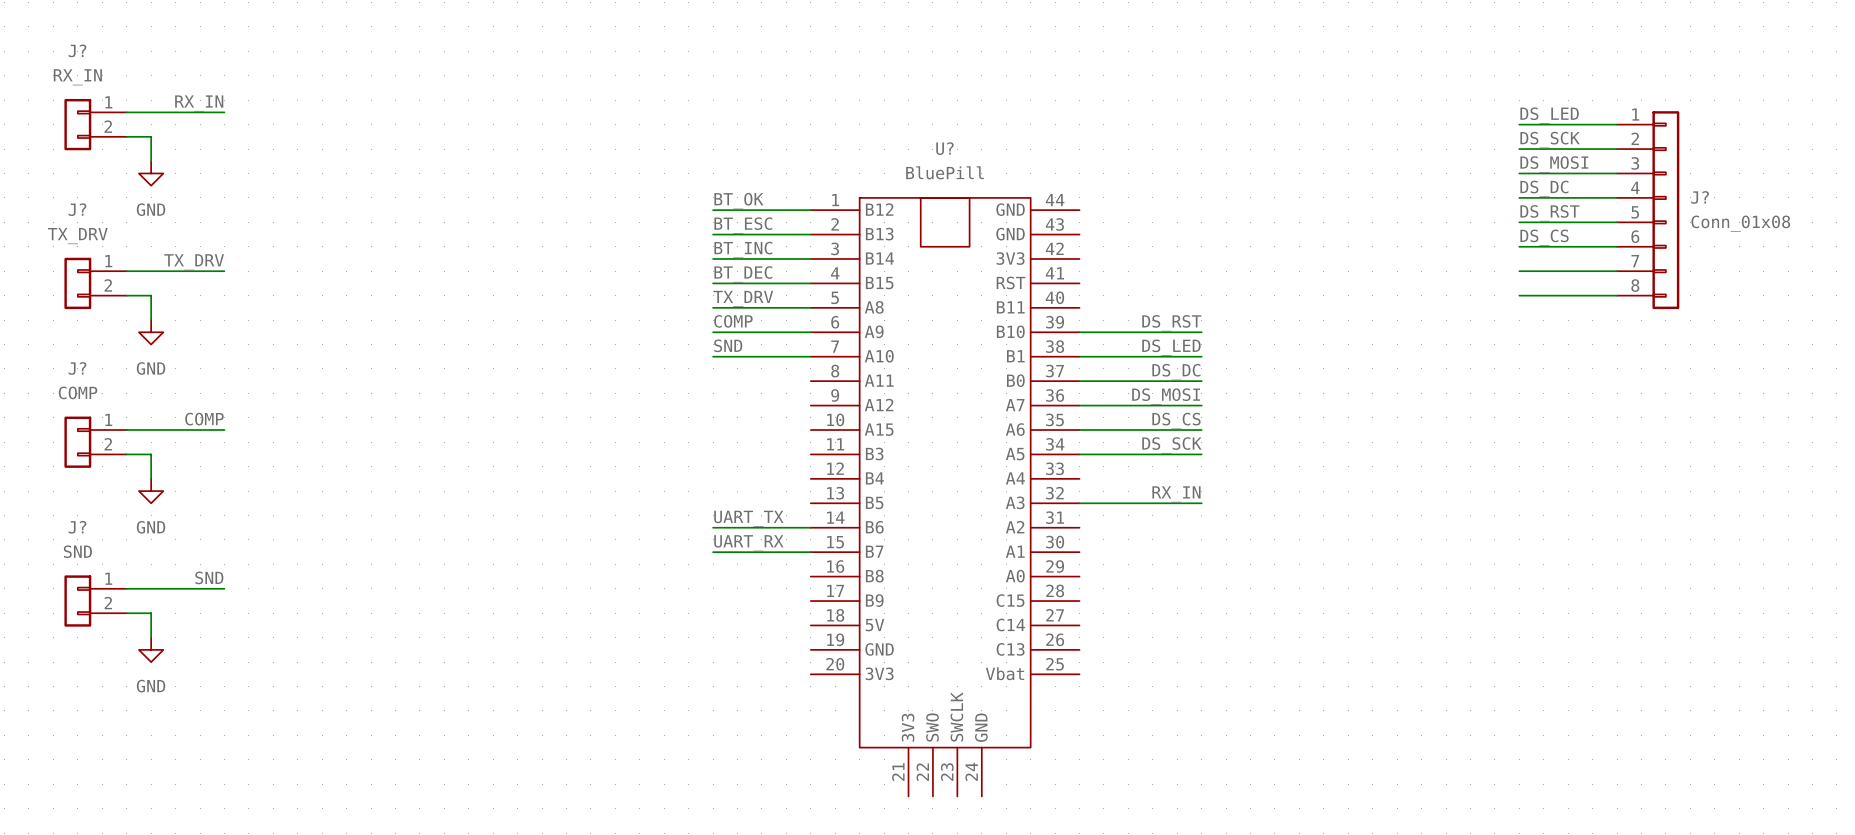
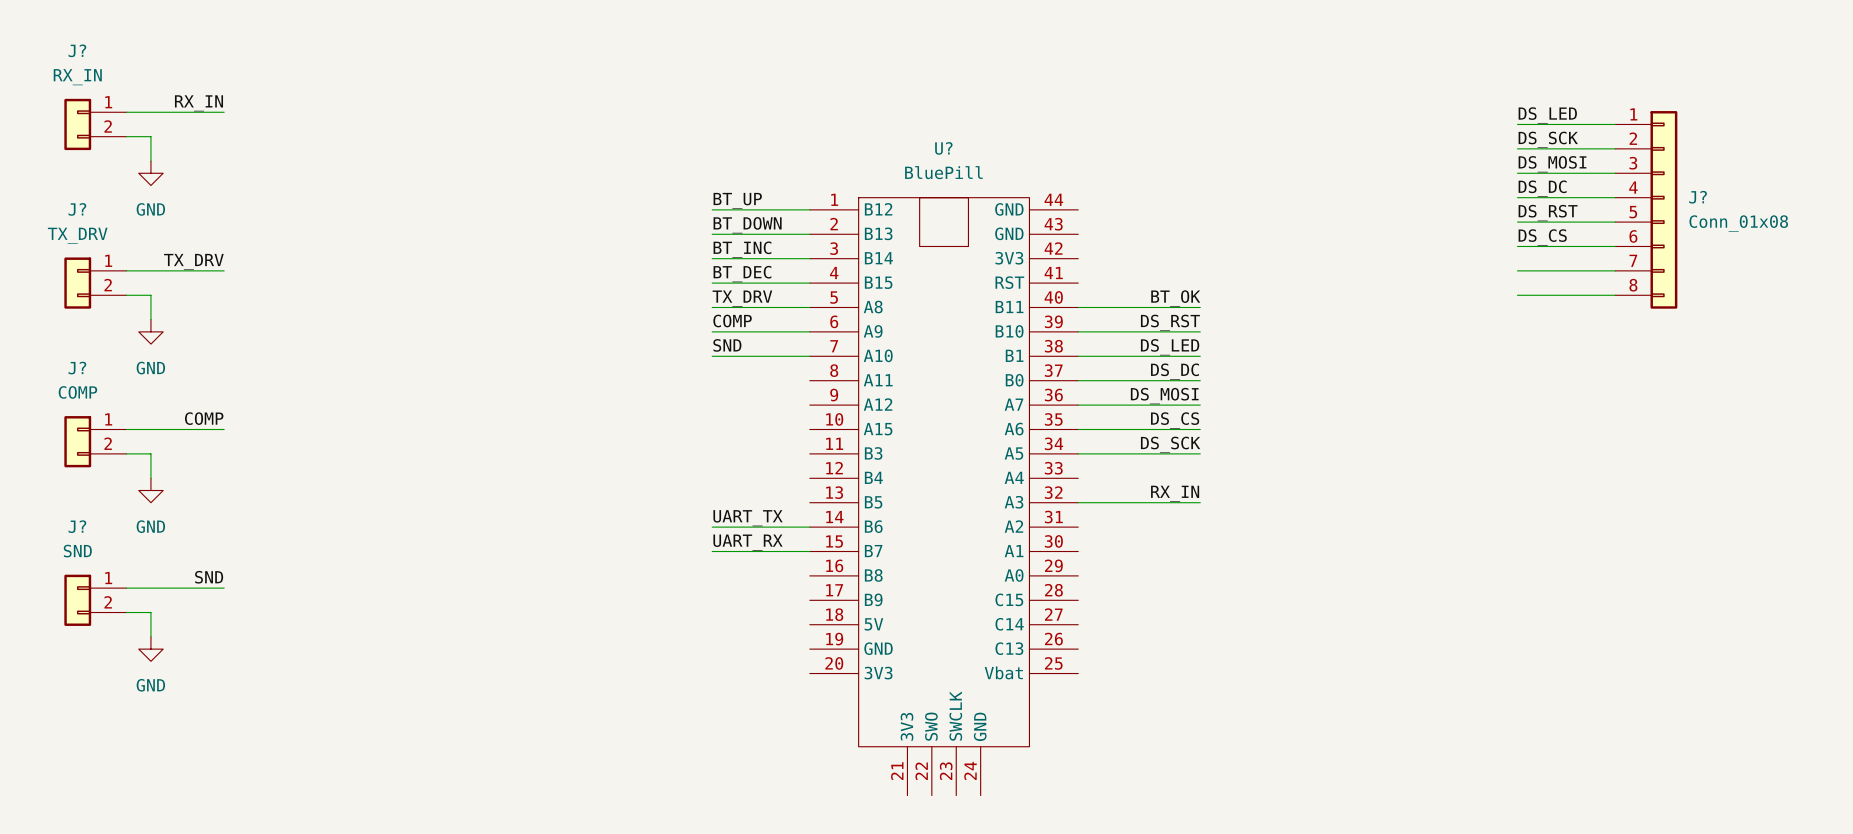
label: BT_OK (738, 201) -> BT_UP (737, 200)
label: BT_ESC (743, 225) -> BT_DOWN (747, 225)
label: none -> BT_OK (1175, 298)
wire: none -> (1078, 307) (1200, 307)

